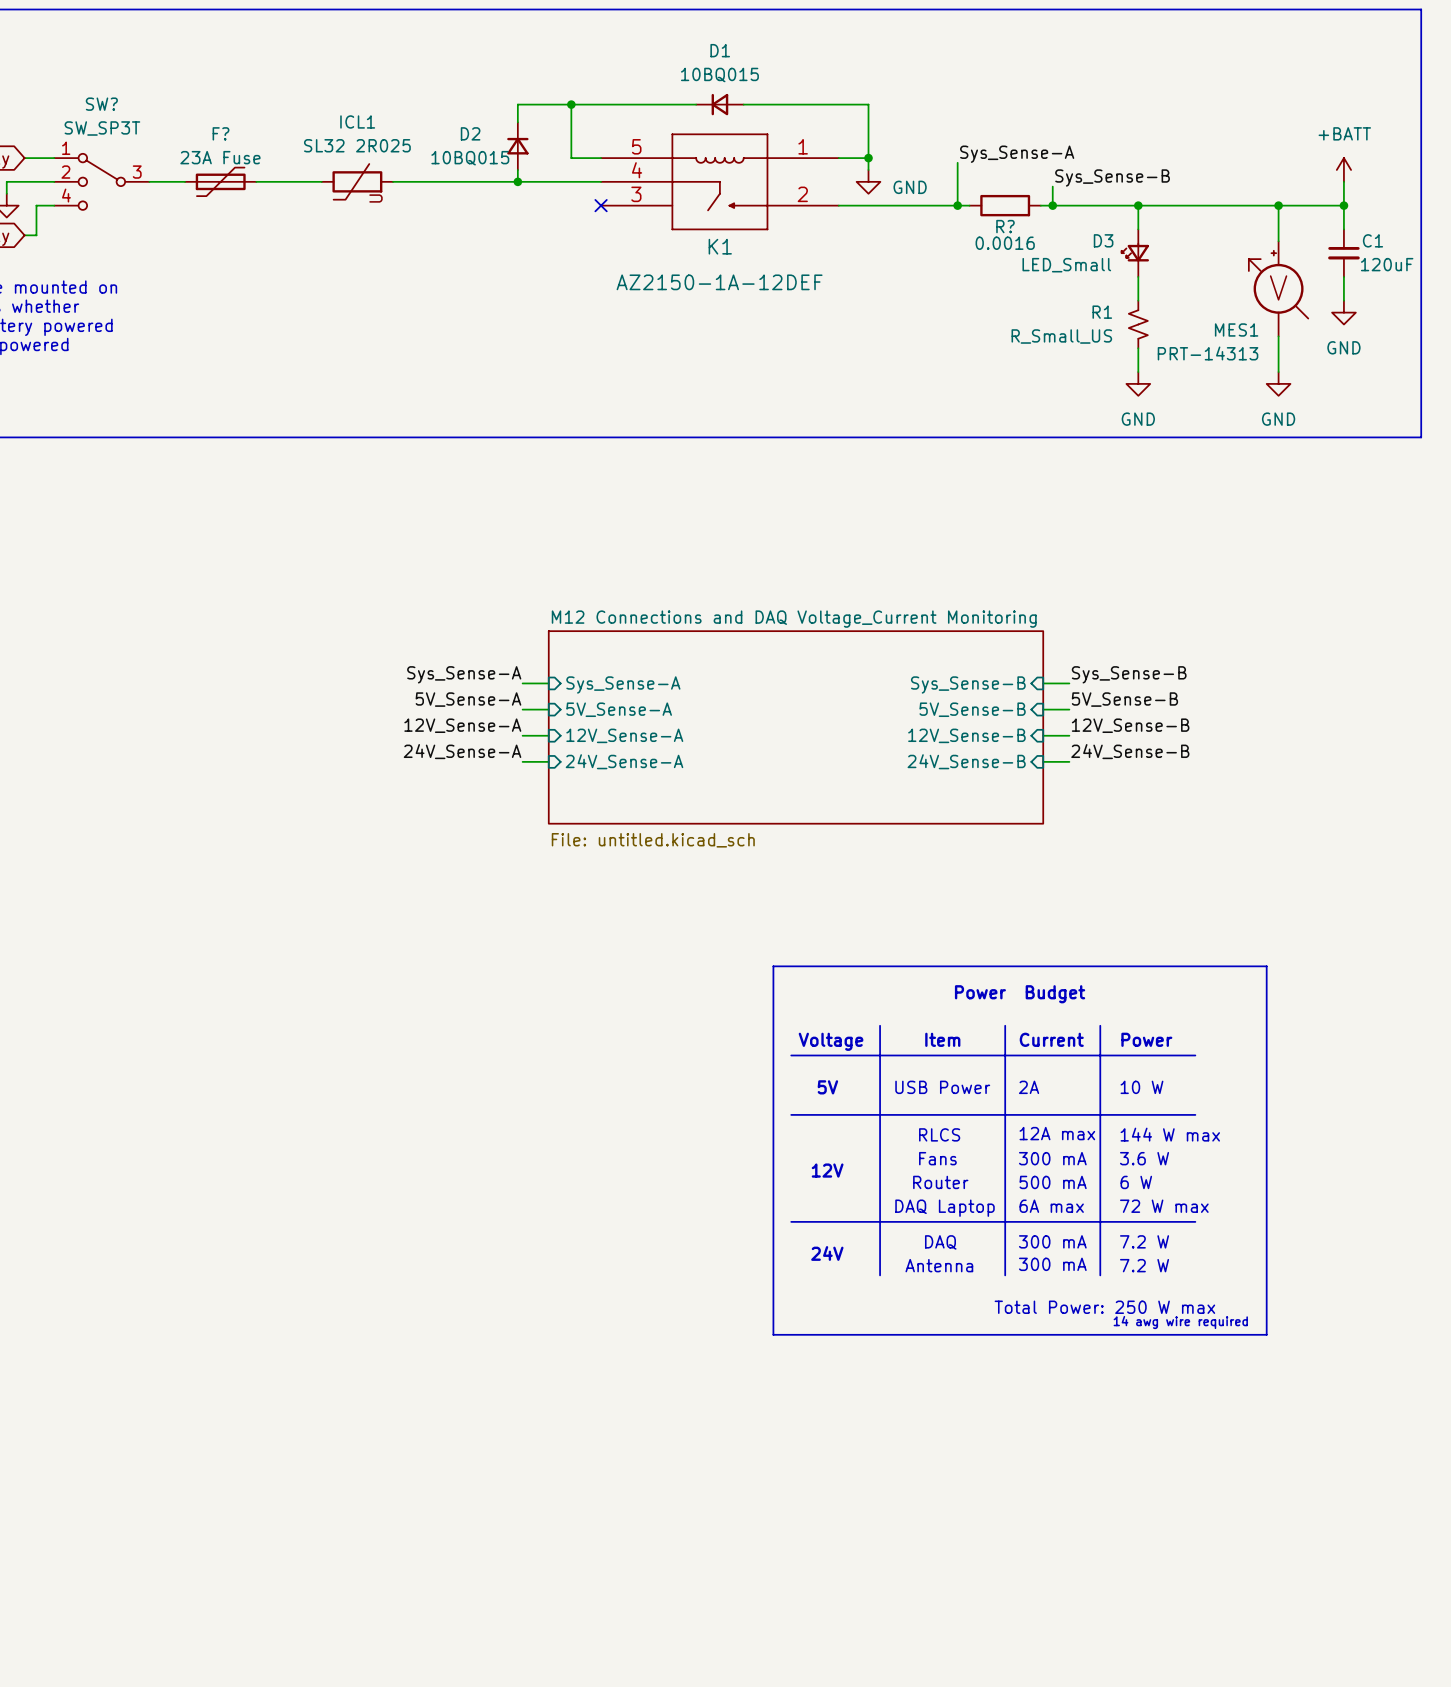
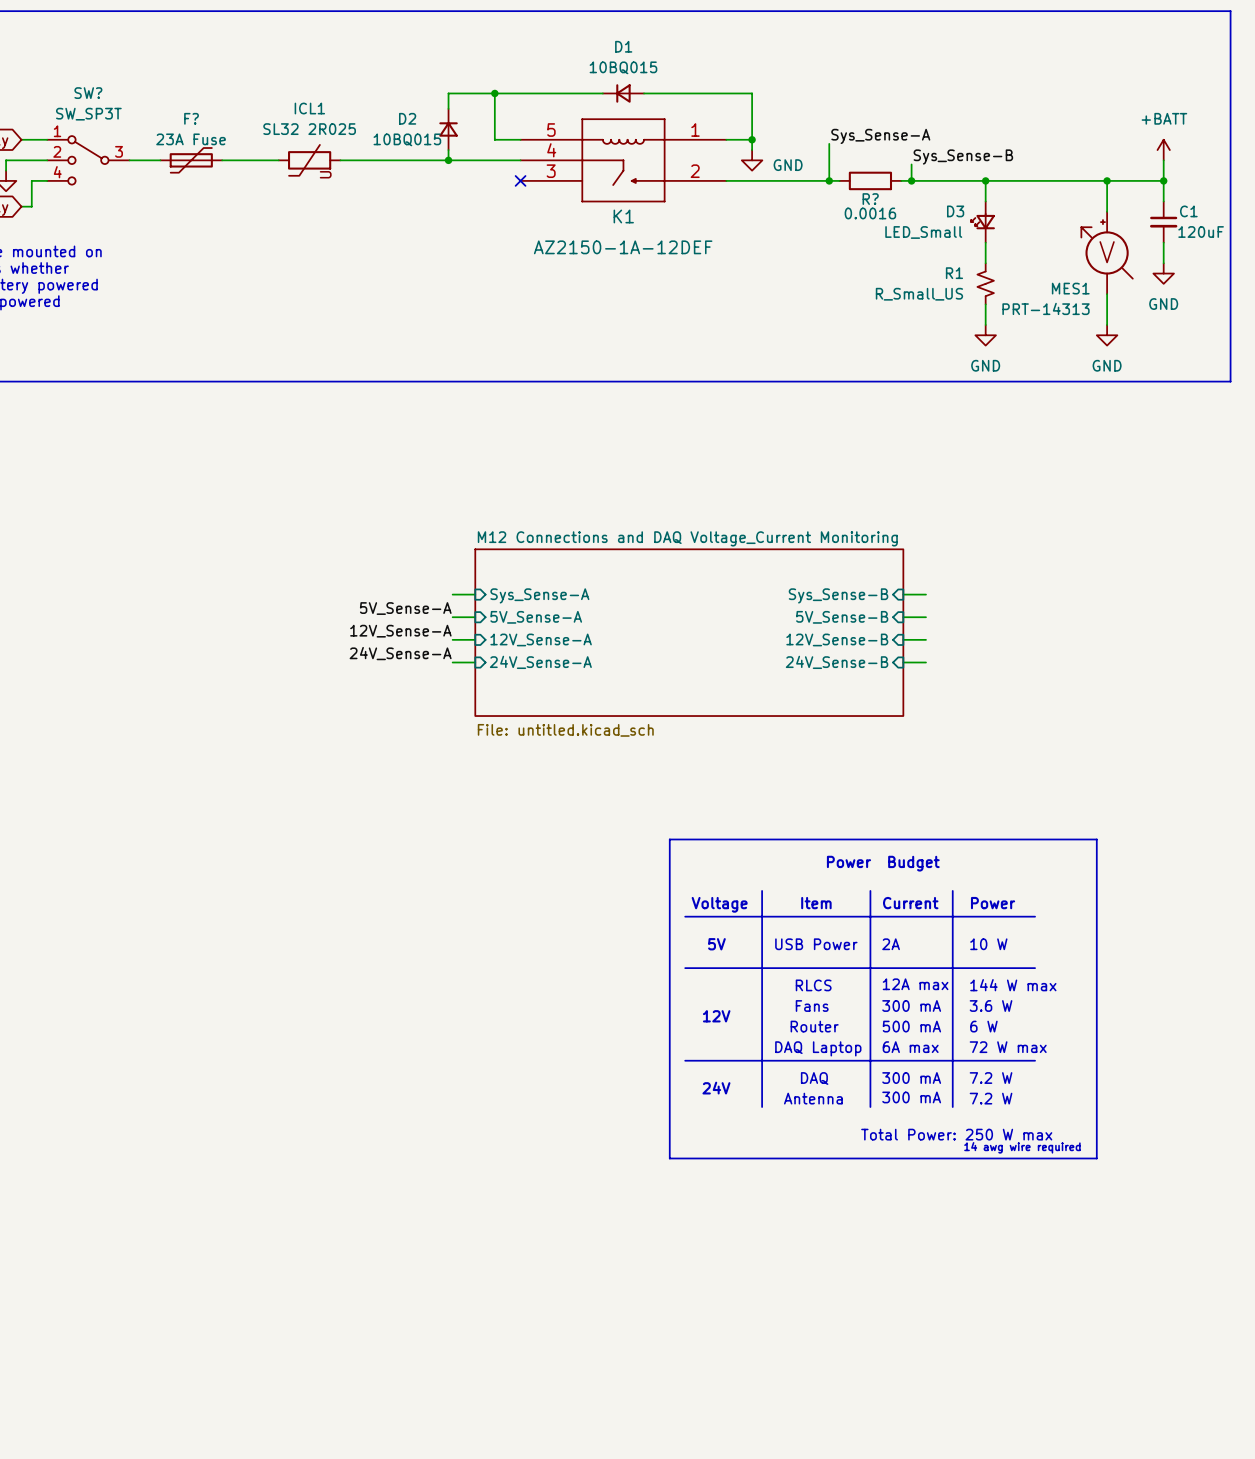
label: Sys_Sense-A (464, 674) -> none
label: Sys_Sense-B (1129, 674) -> none
label: 5V_Sense-B (1124, 699) -> none
label: 12V_Sense-B (1130, 725) -> none
label: 24V_Sense-B (1130, 751) -> none

